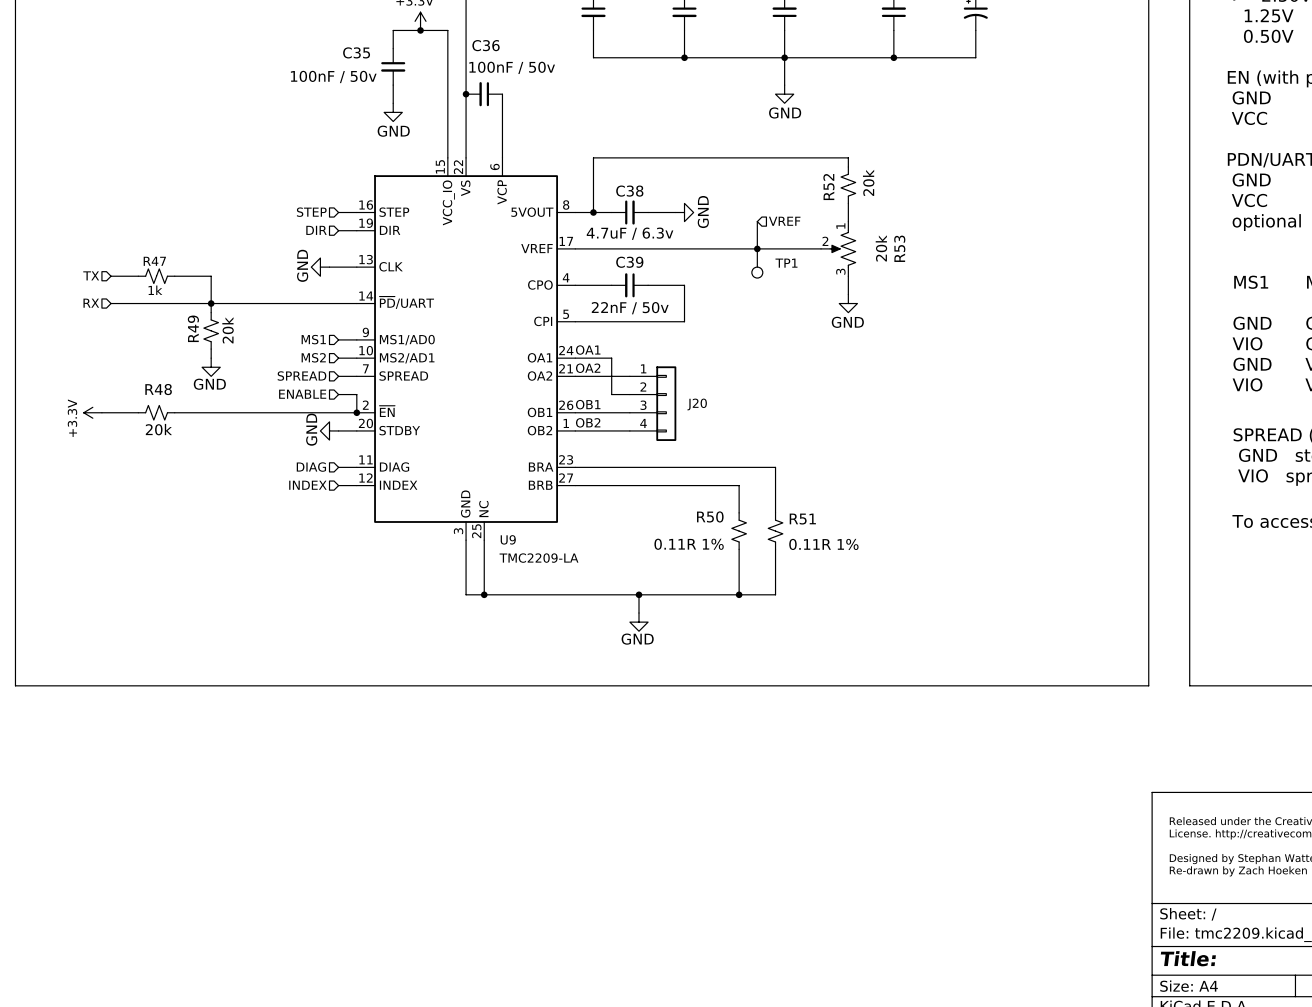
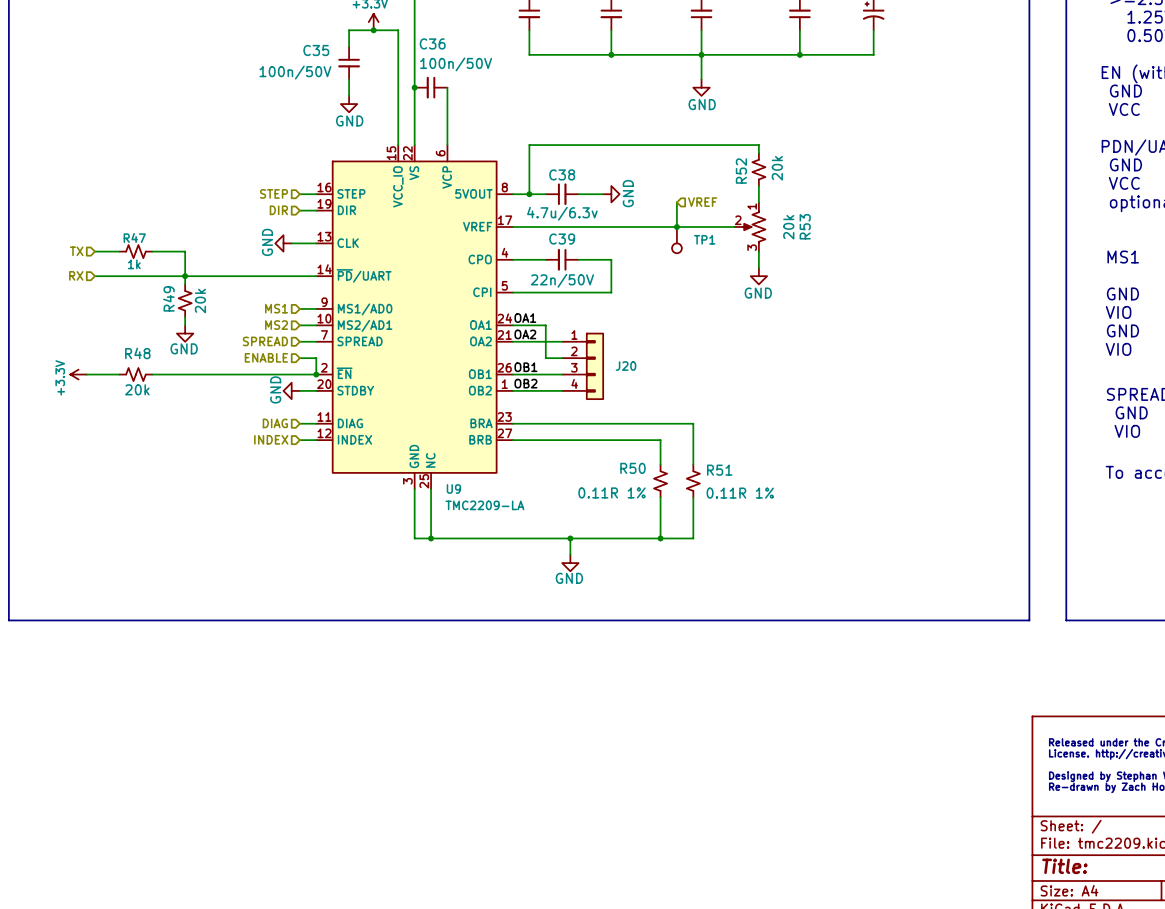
C36 value: 100nF / 50v (512, 67) -> 100n/50V (456, 64)
C35 value: 100nF / 50v (333, 76) -> 100n/50V (295, 72)
C38 value: 4.7uF / 6.3v (630, 233) -> 4.7u/6.3v (562, 213)
C39 value: 22nF / 50v (630, 308) -> 22n/50V (562, 280)

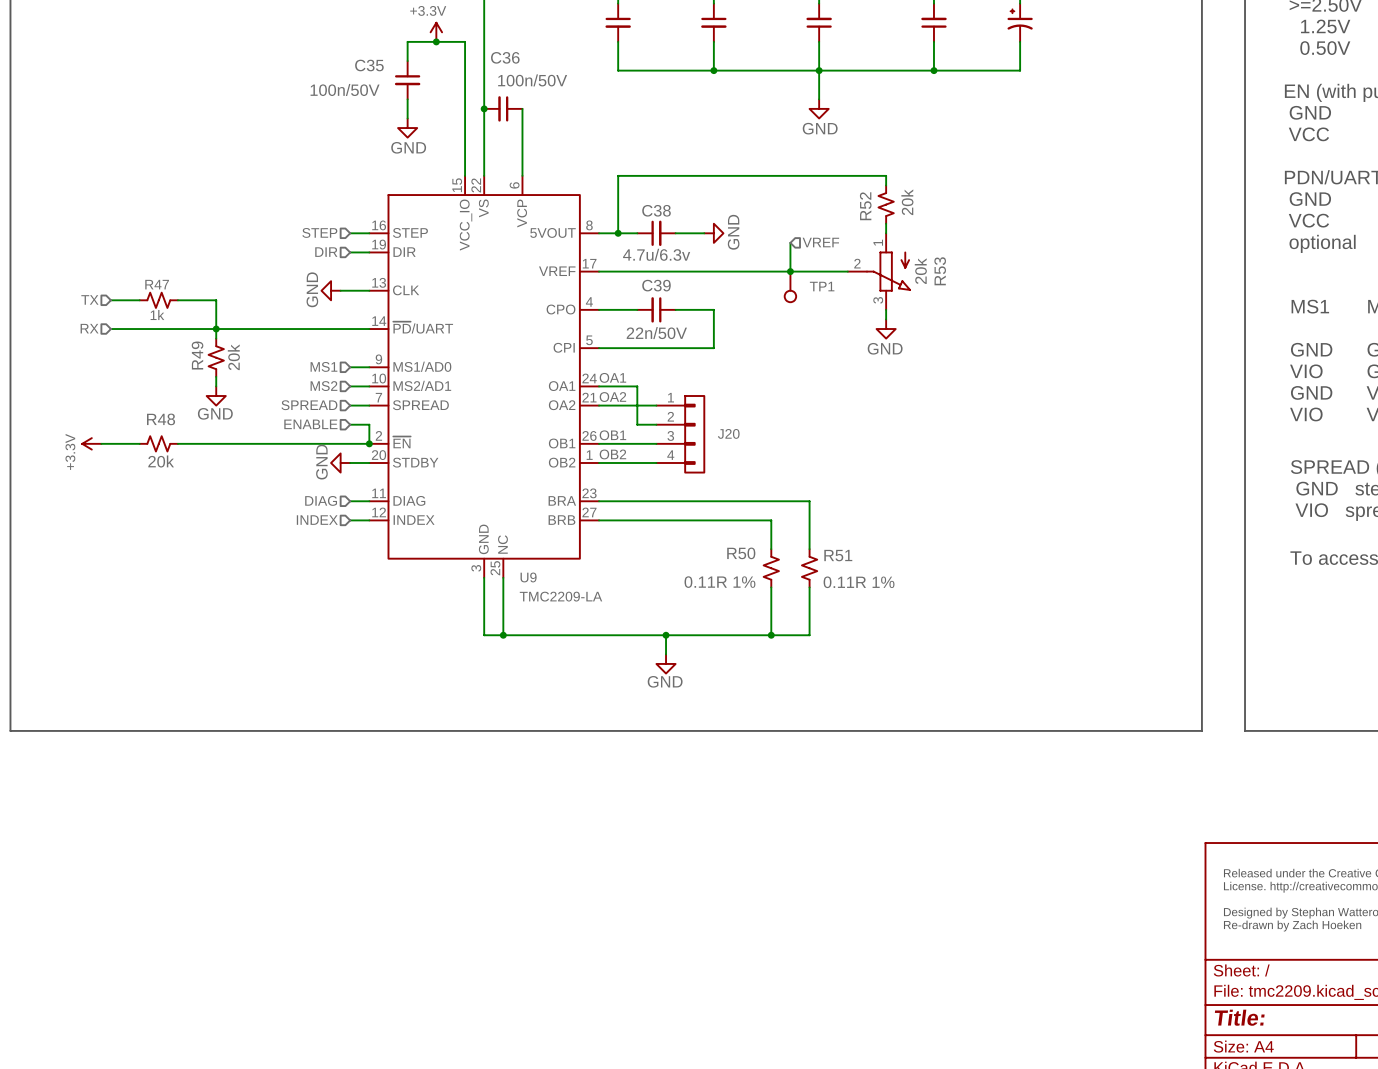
R53 symbol: [734, 202, 766, 252] -> [847, 233, 911, 310]

